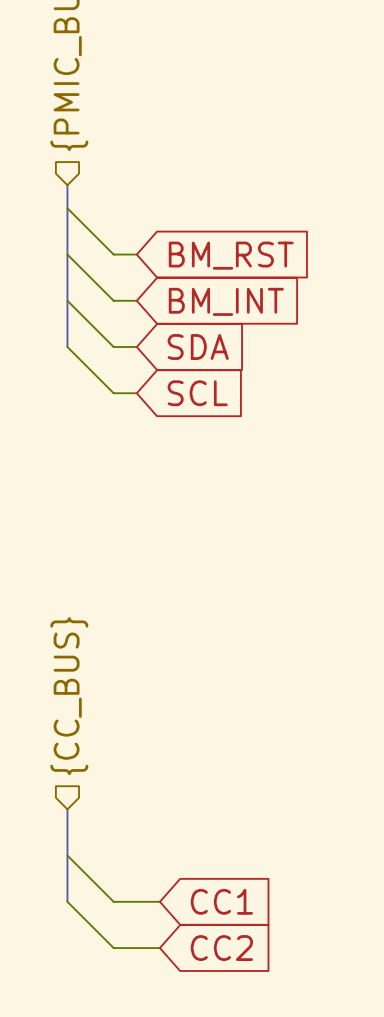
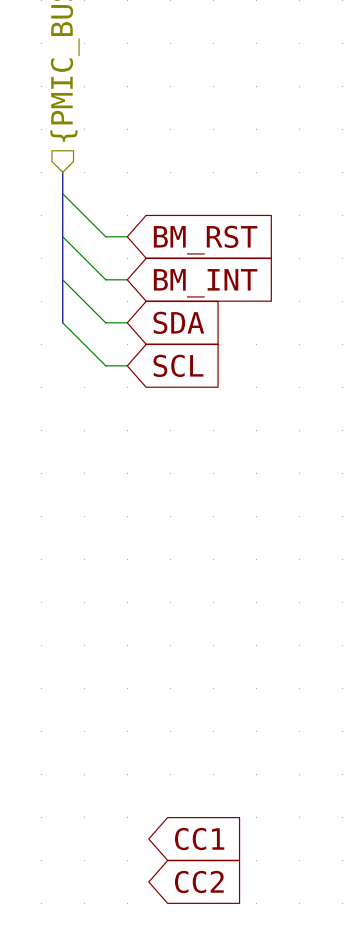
hierarchical label: {CC_BUS} (69, 696) -> none
bus: (67, 809) (67, 901) -> none
wire: (67, 855) (113, 901) (159, 901) -> none
wire: (67, 901) (113, 948) (159, 948) -> none

